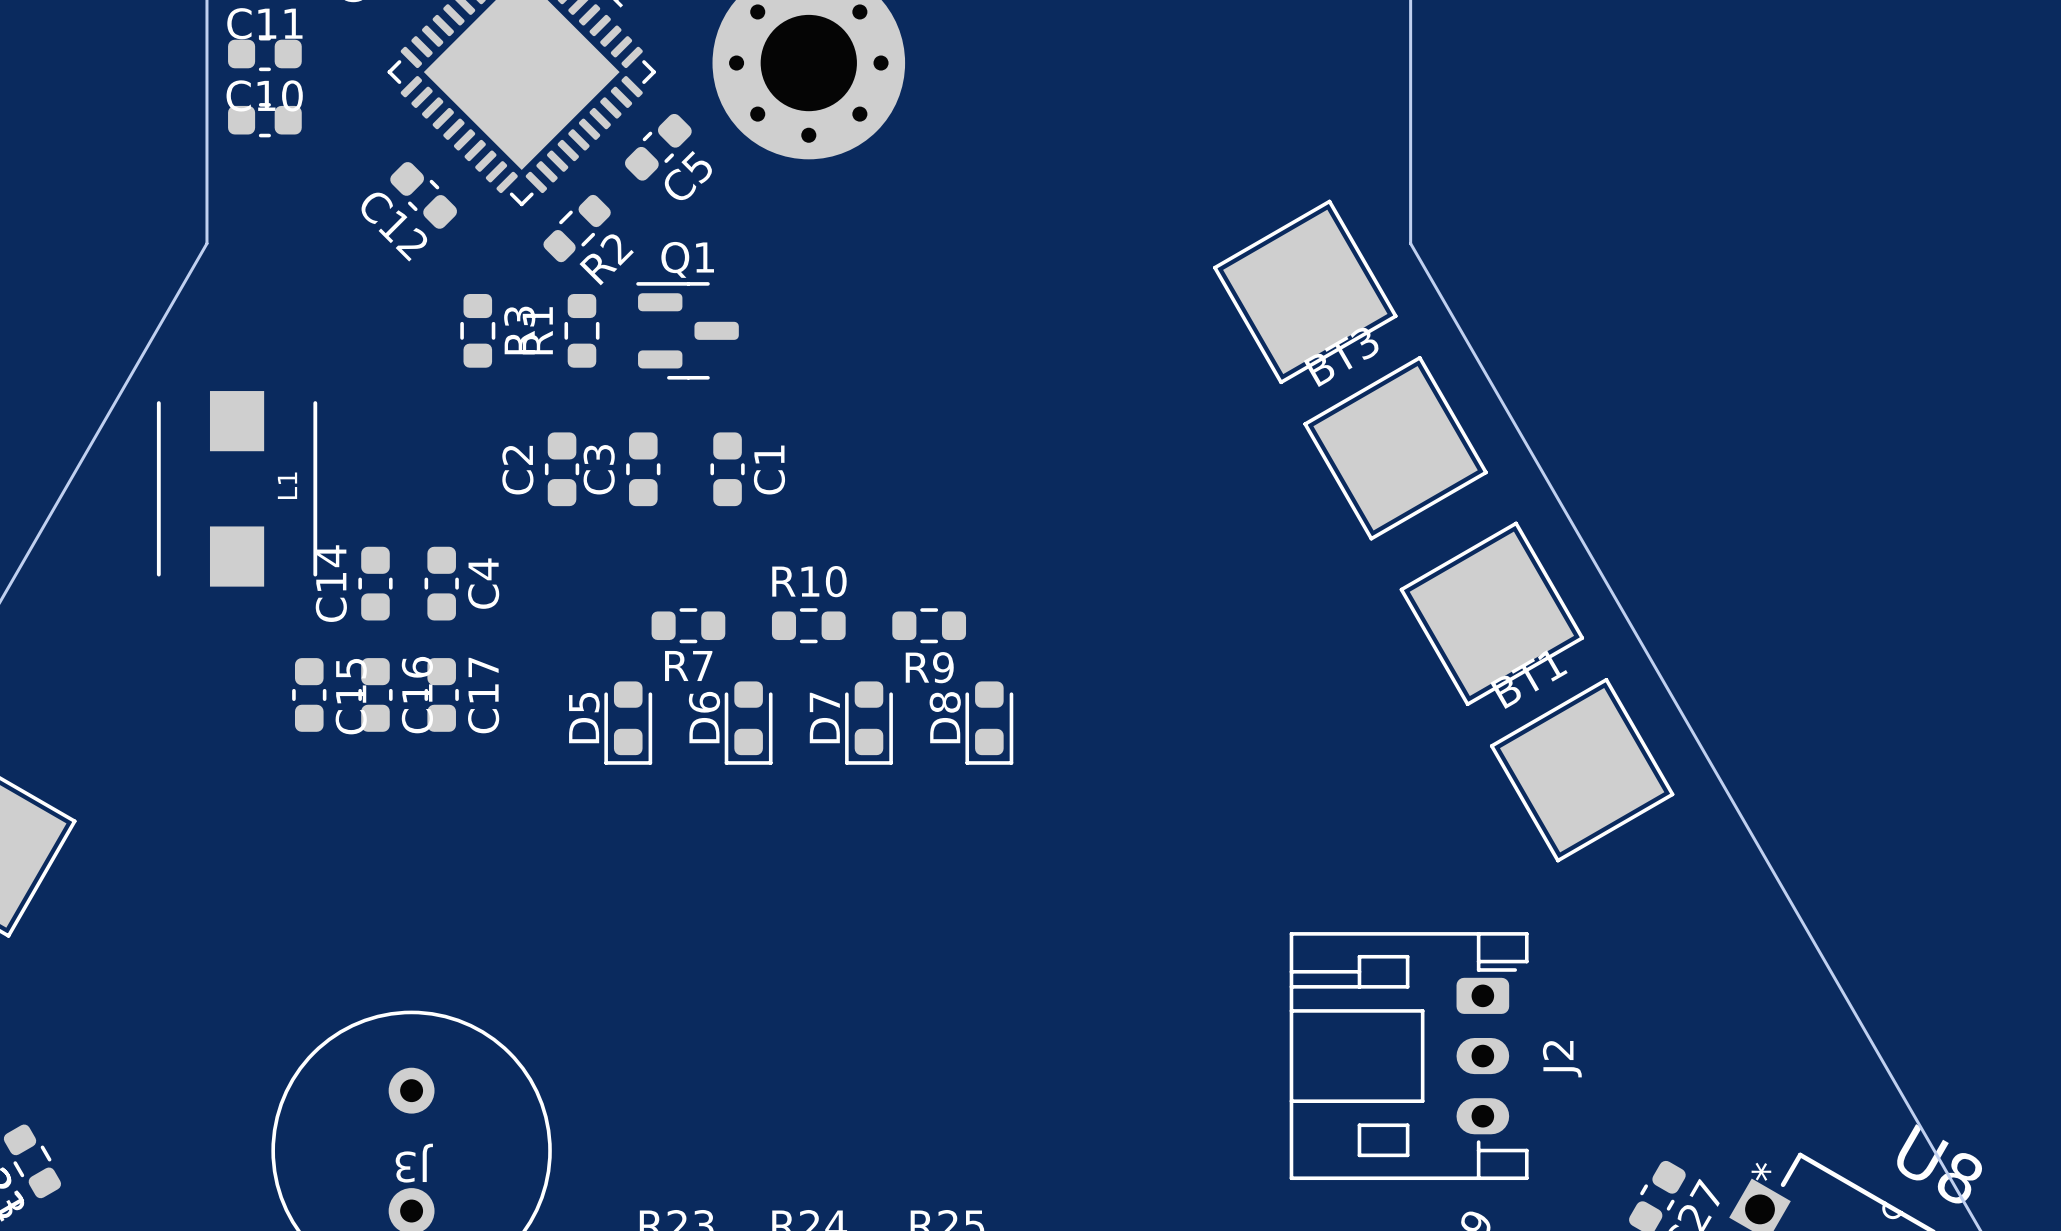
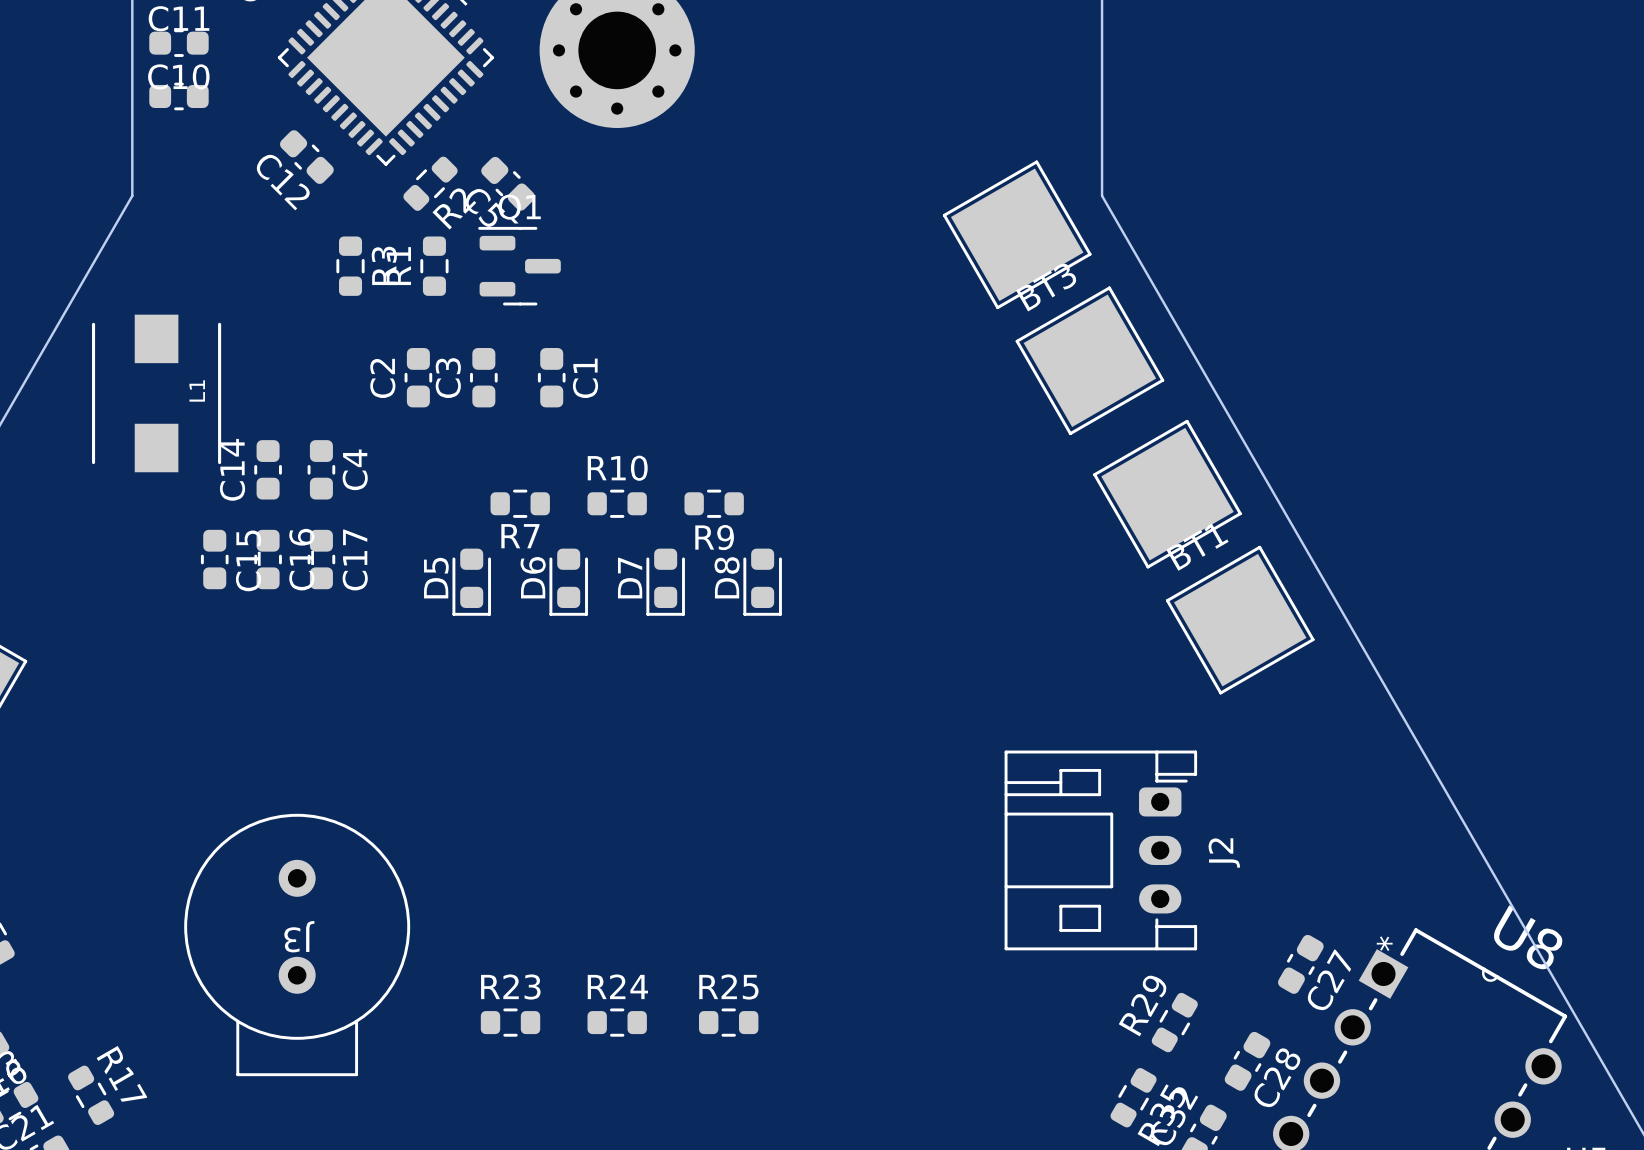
C5 rotation: 0° (658, 147) -> 90° clockwise (508, 183)
C5 position: (658, 147) -> (508, 183)

